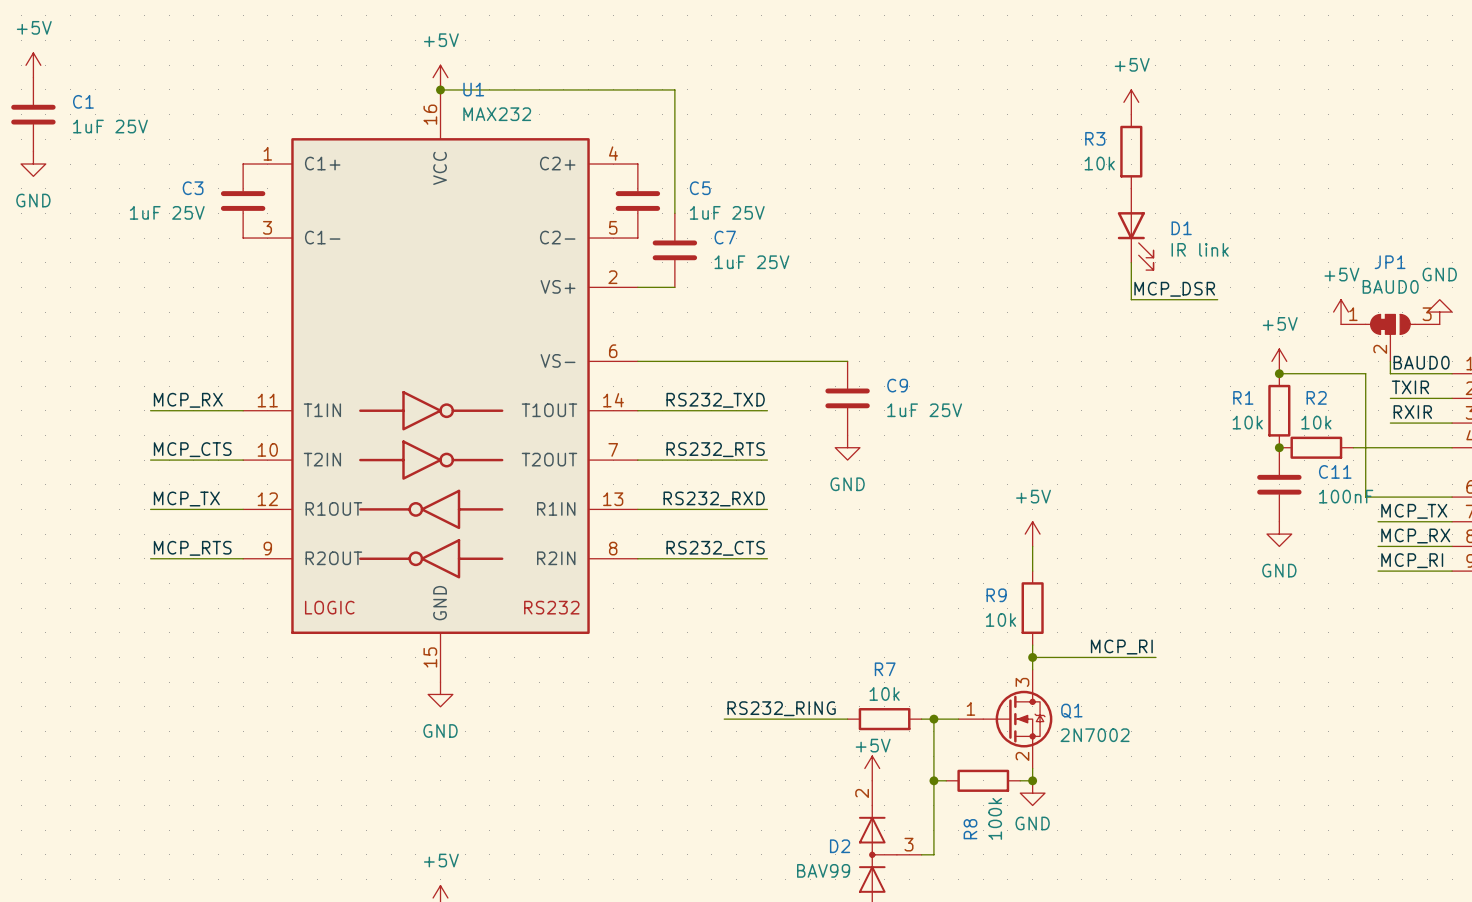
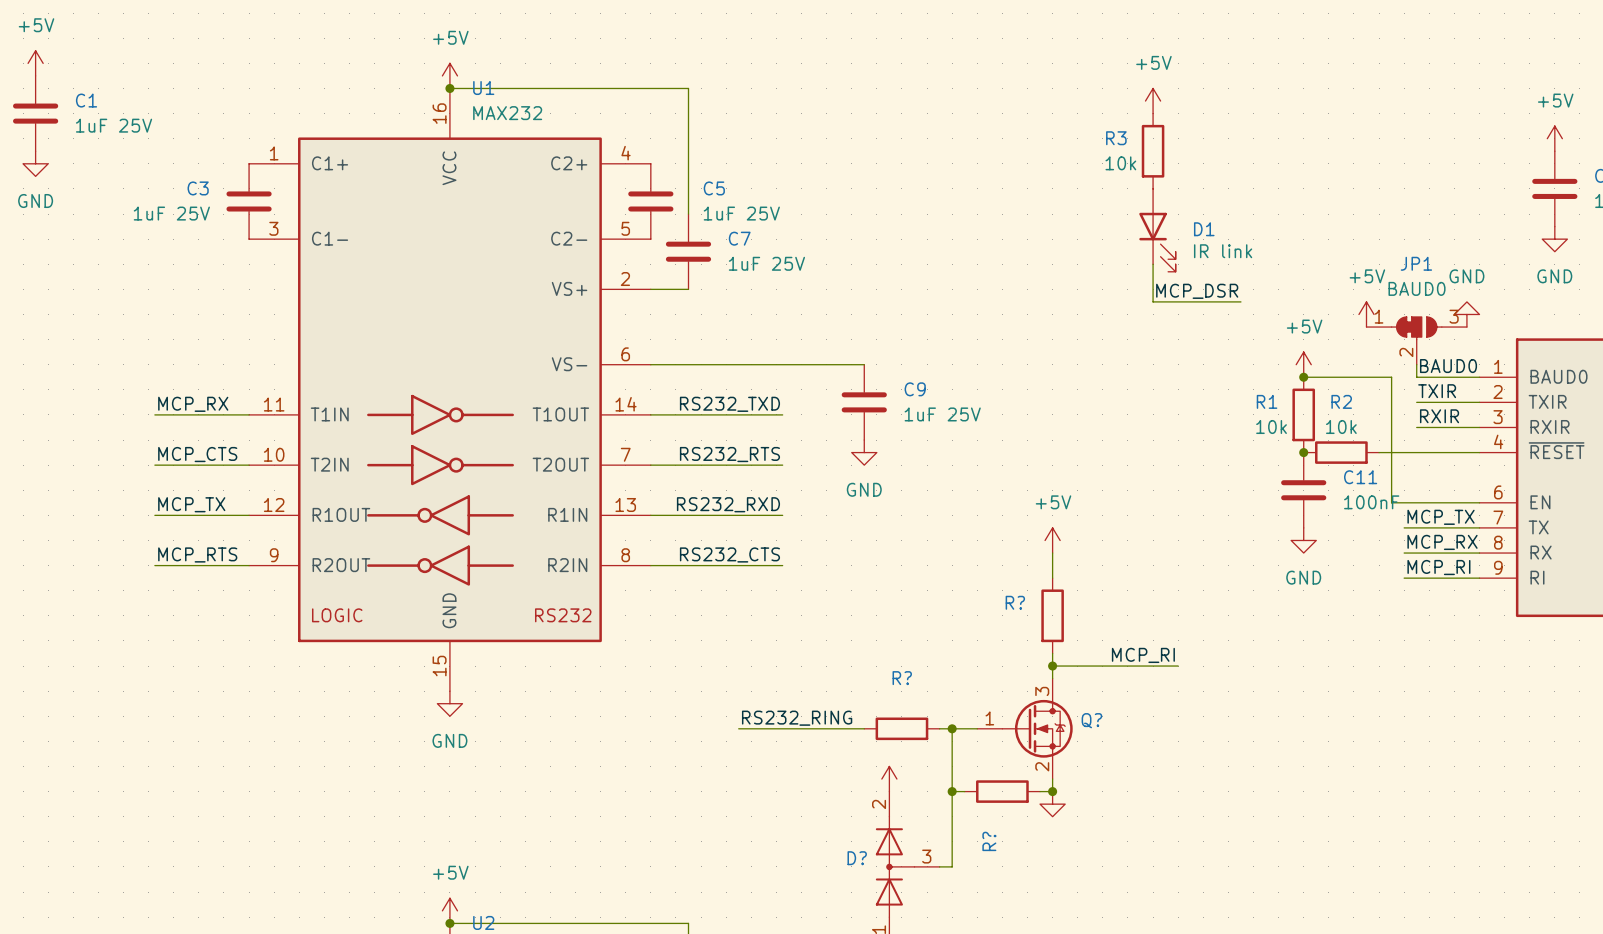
R9 name: R9 (996, 595) -> R? (1015, 602)
R9 value: 10k (1001, 619) -> none
R7 name: R7 (885, 669) -> R? (902, 678)
R7 value: 10k (884, 693) -> none
Q1 name: Q1 (1071, 711) -> Q? (1091, 720)
Q1 value: 2N7002 (1095, 735) -> none
power symbol text: +5V (873, 745) -> none
R8 value: 100k (995, 818) -> none
power symbol text: GND (1032, 823) -> none
R8 name: R8 (970, 829) -> R? (989, 841)
D2 name: D2 (840, 846) -> D? (857, 858)
D2 value: BAV99 (823, 870) -> none

